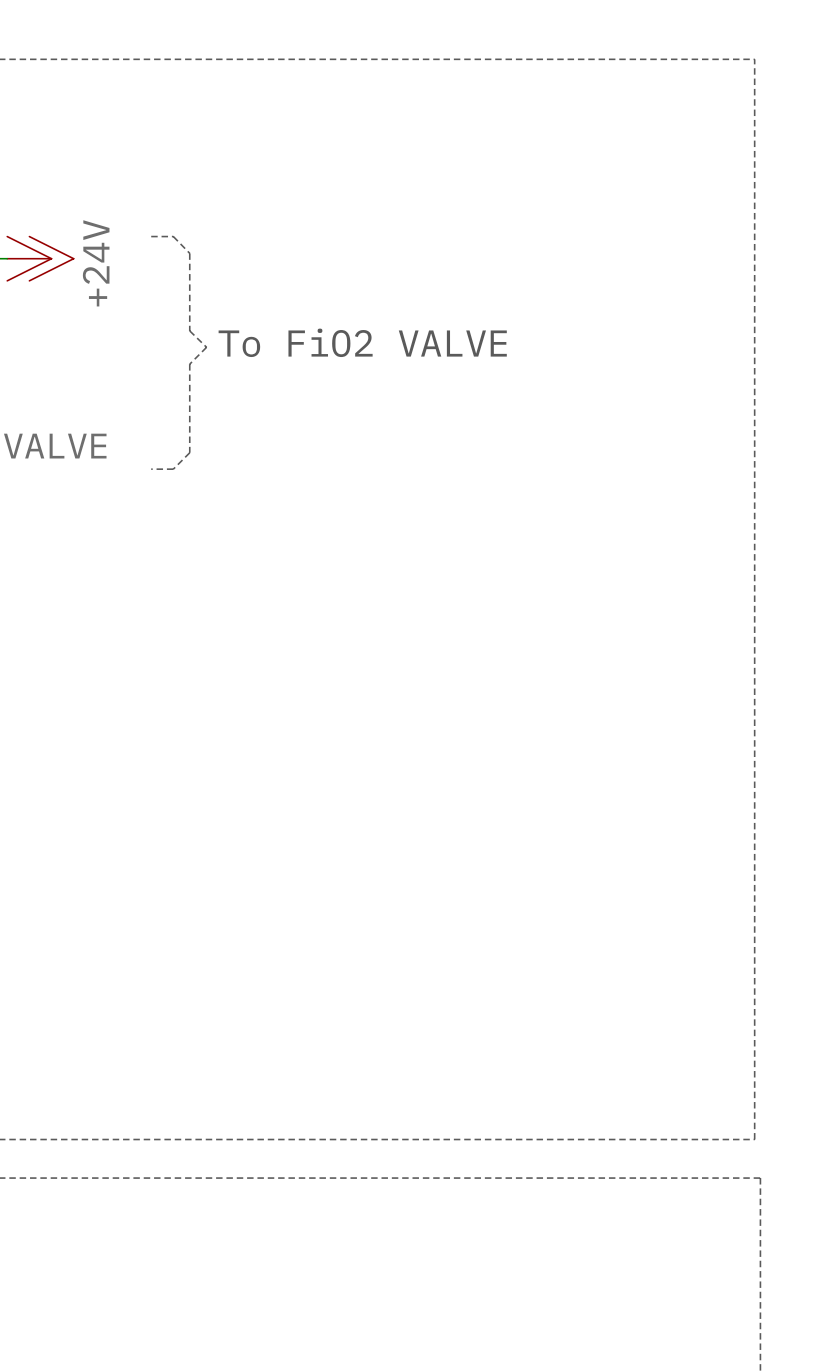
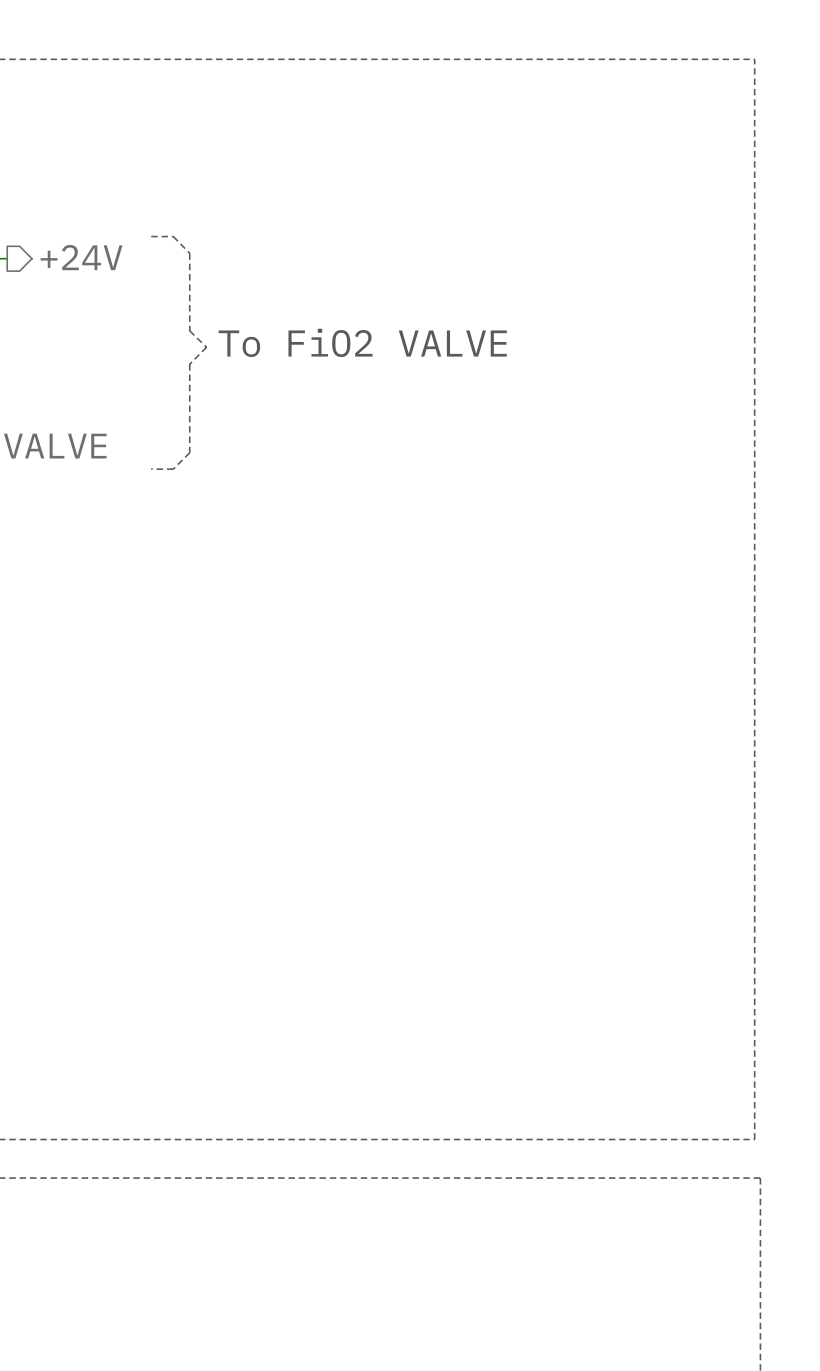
hierarchical label: none -> +24V (81, 257)
power symbol: +24V (40, 258) -> none

